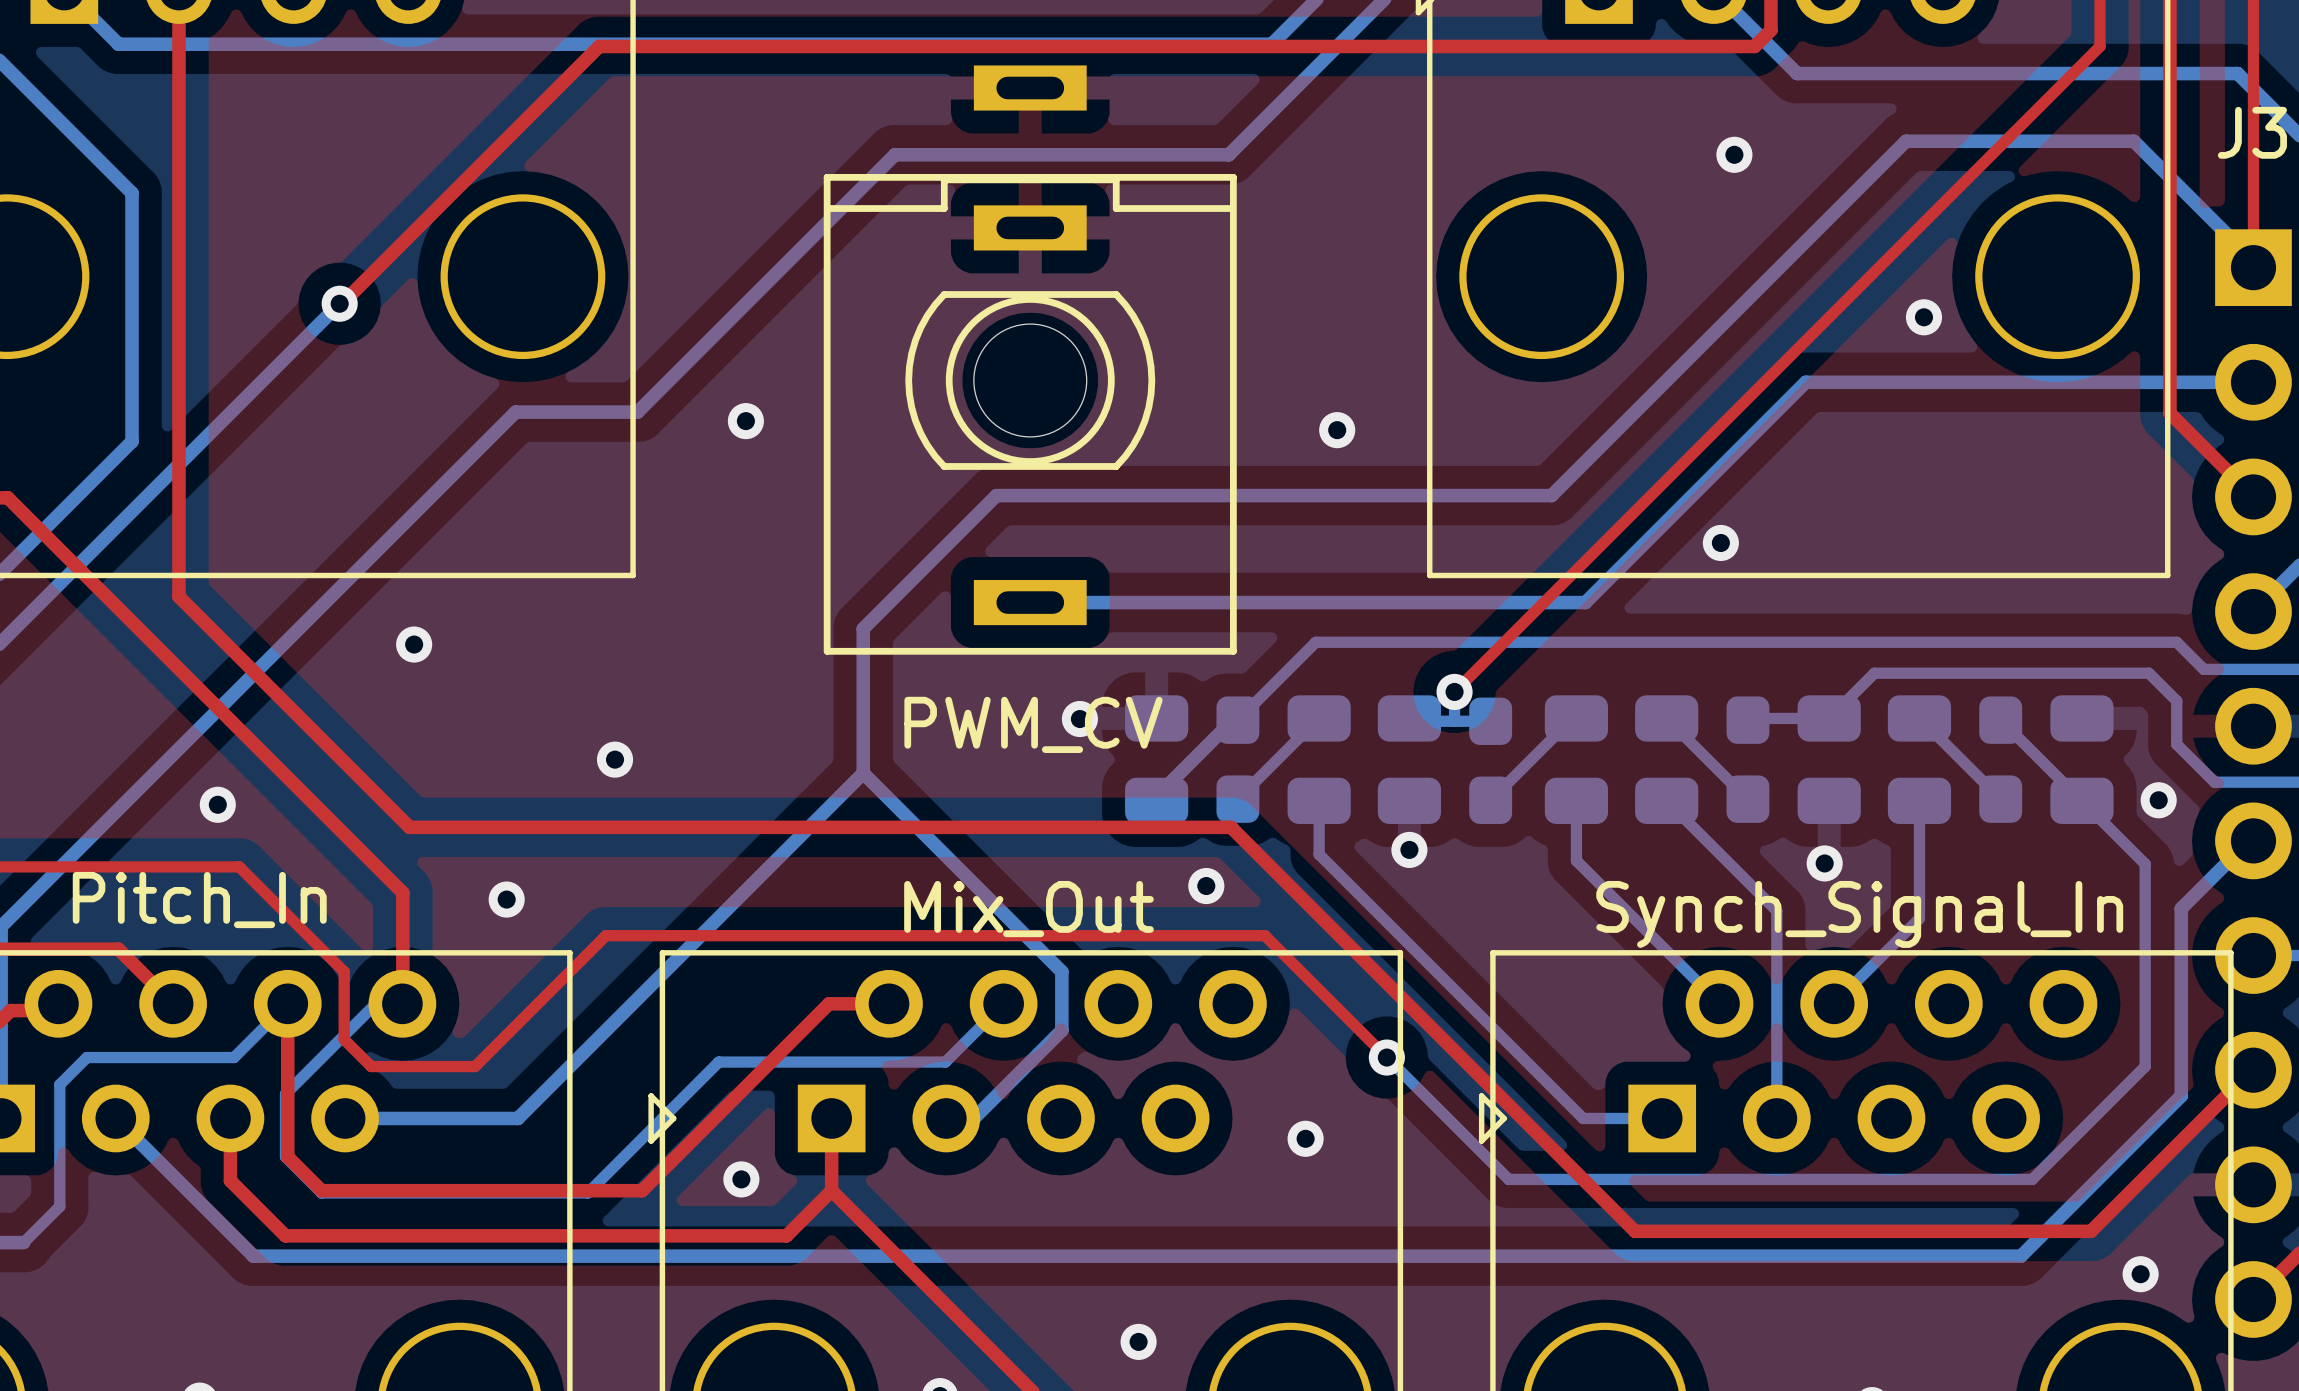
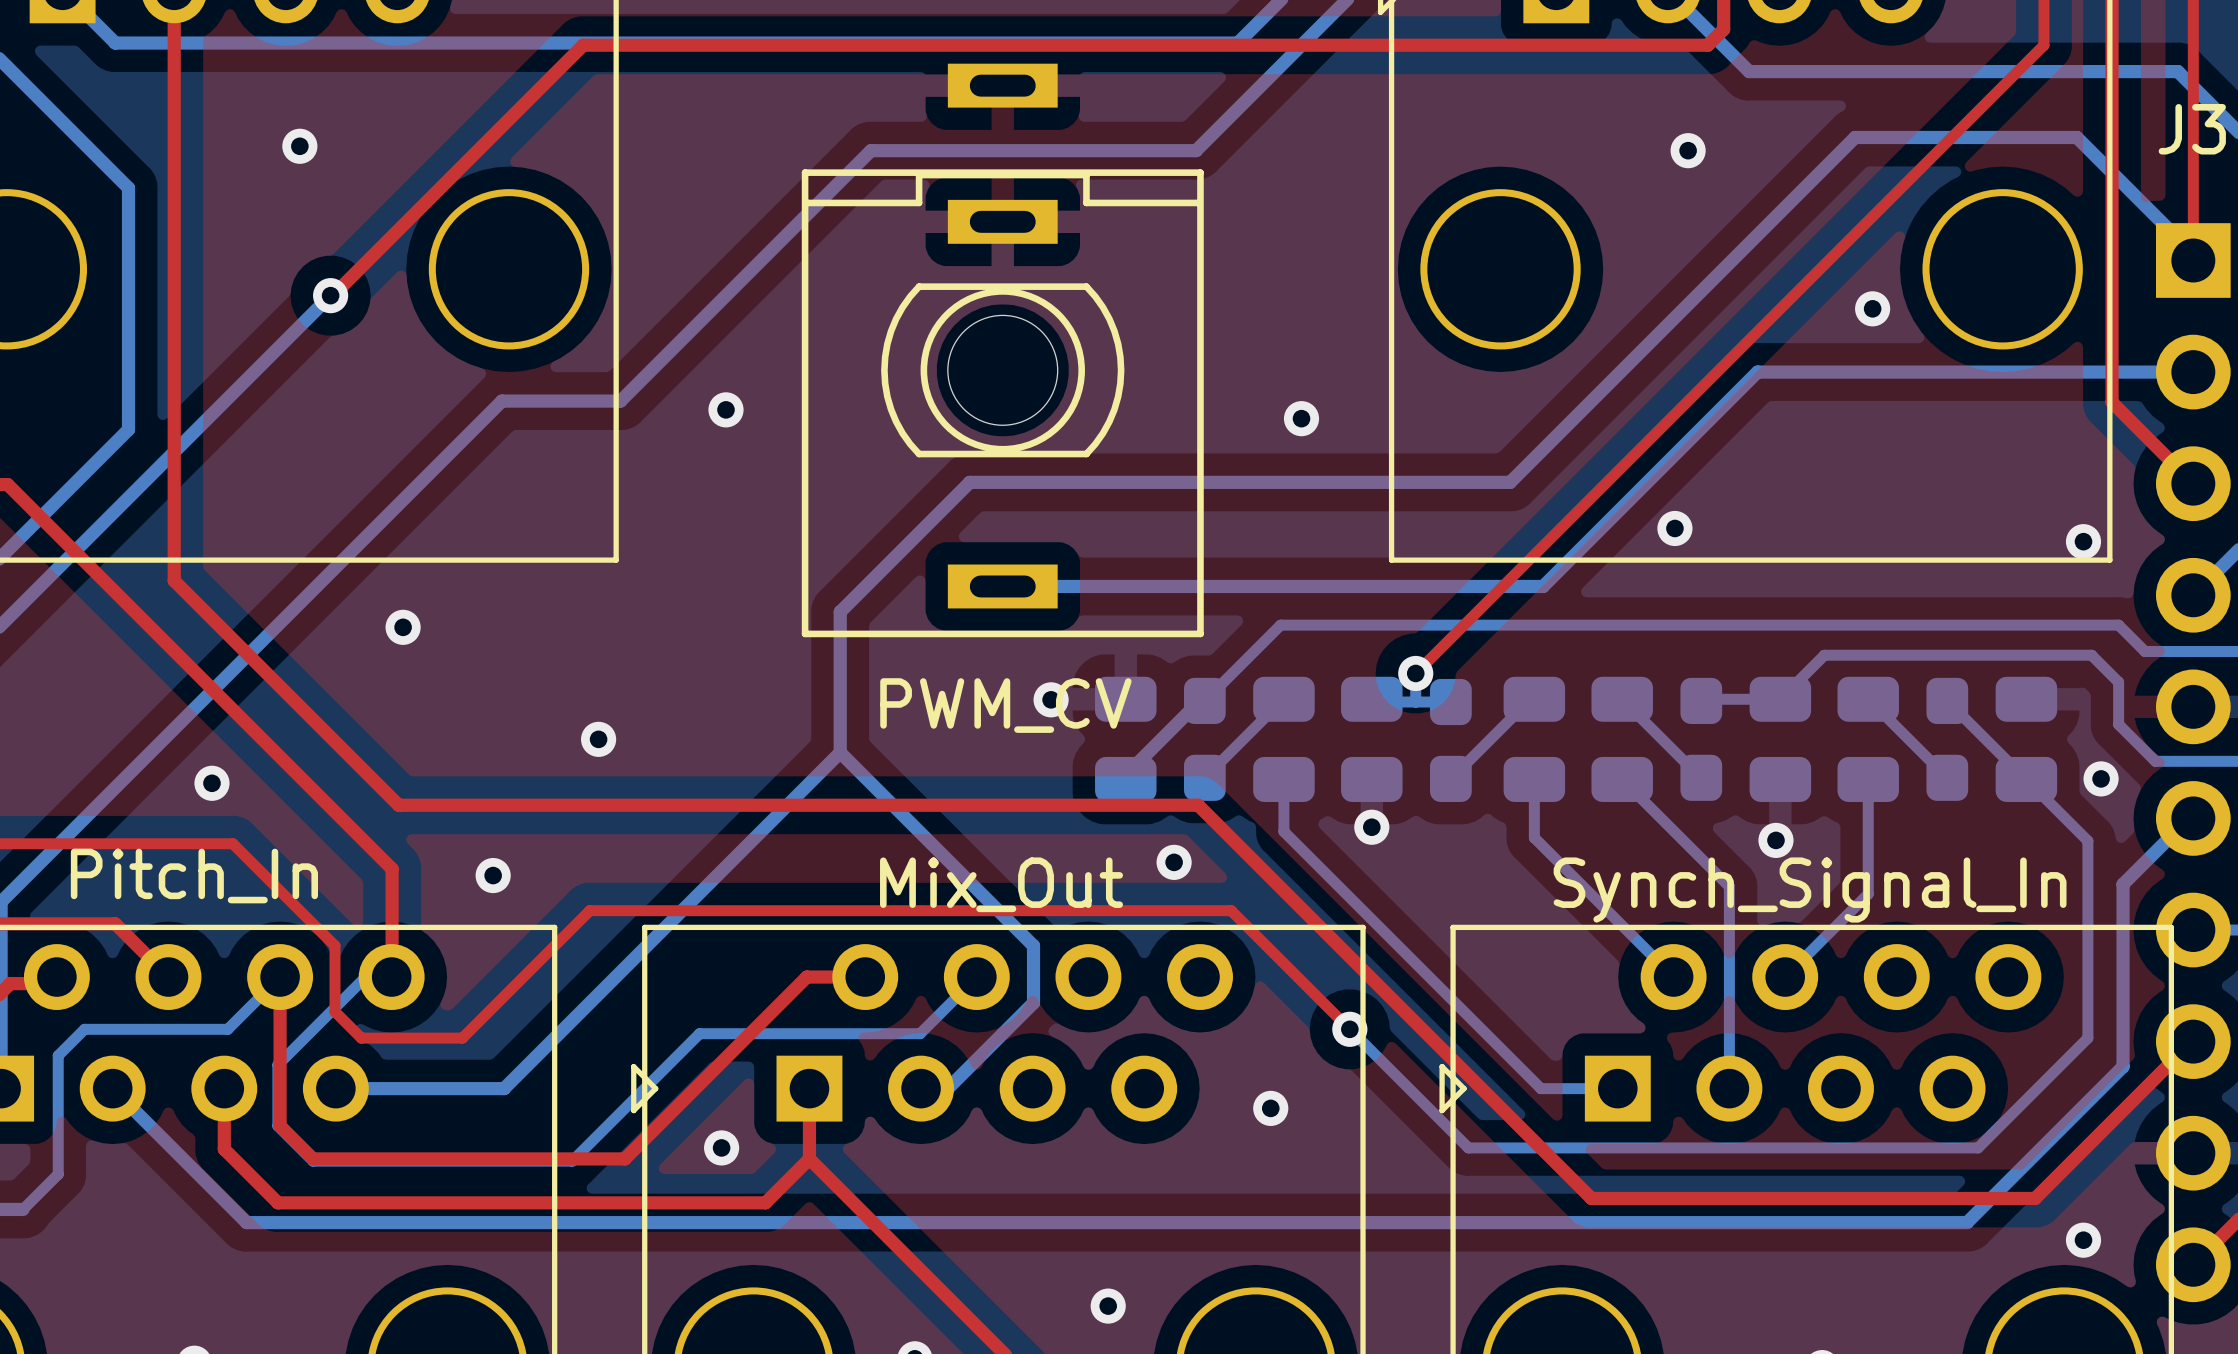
via: none -> (299, 146)
via: none -> (2083, 541)

